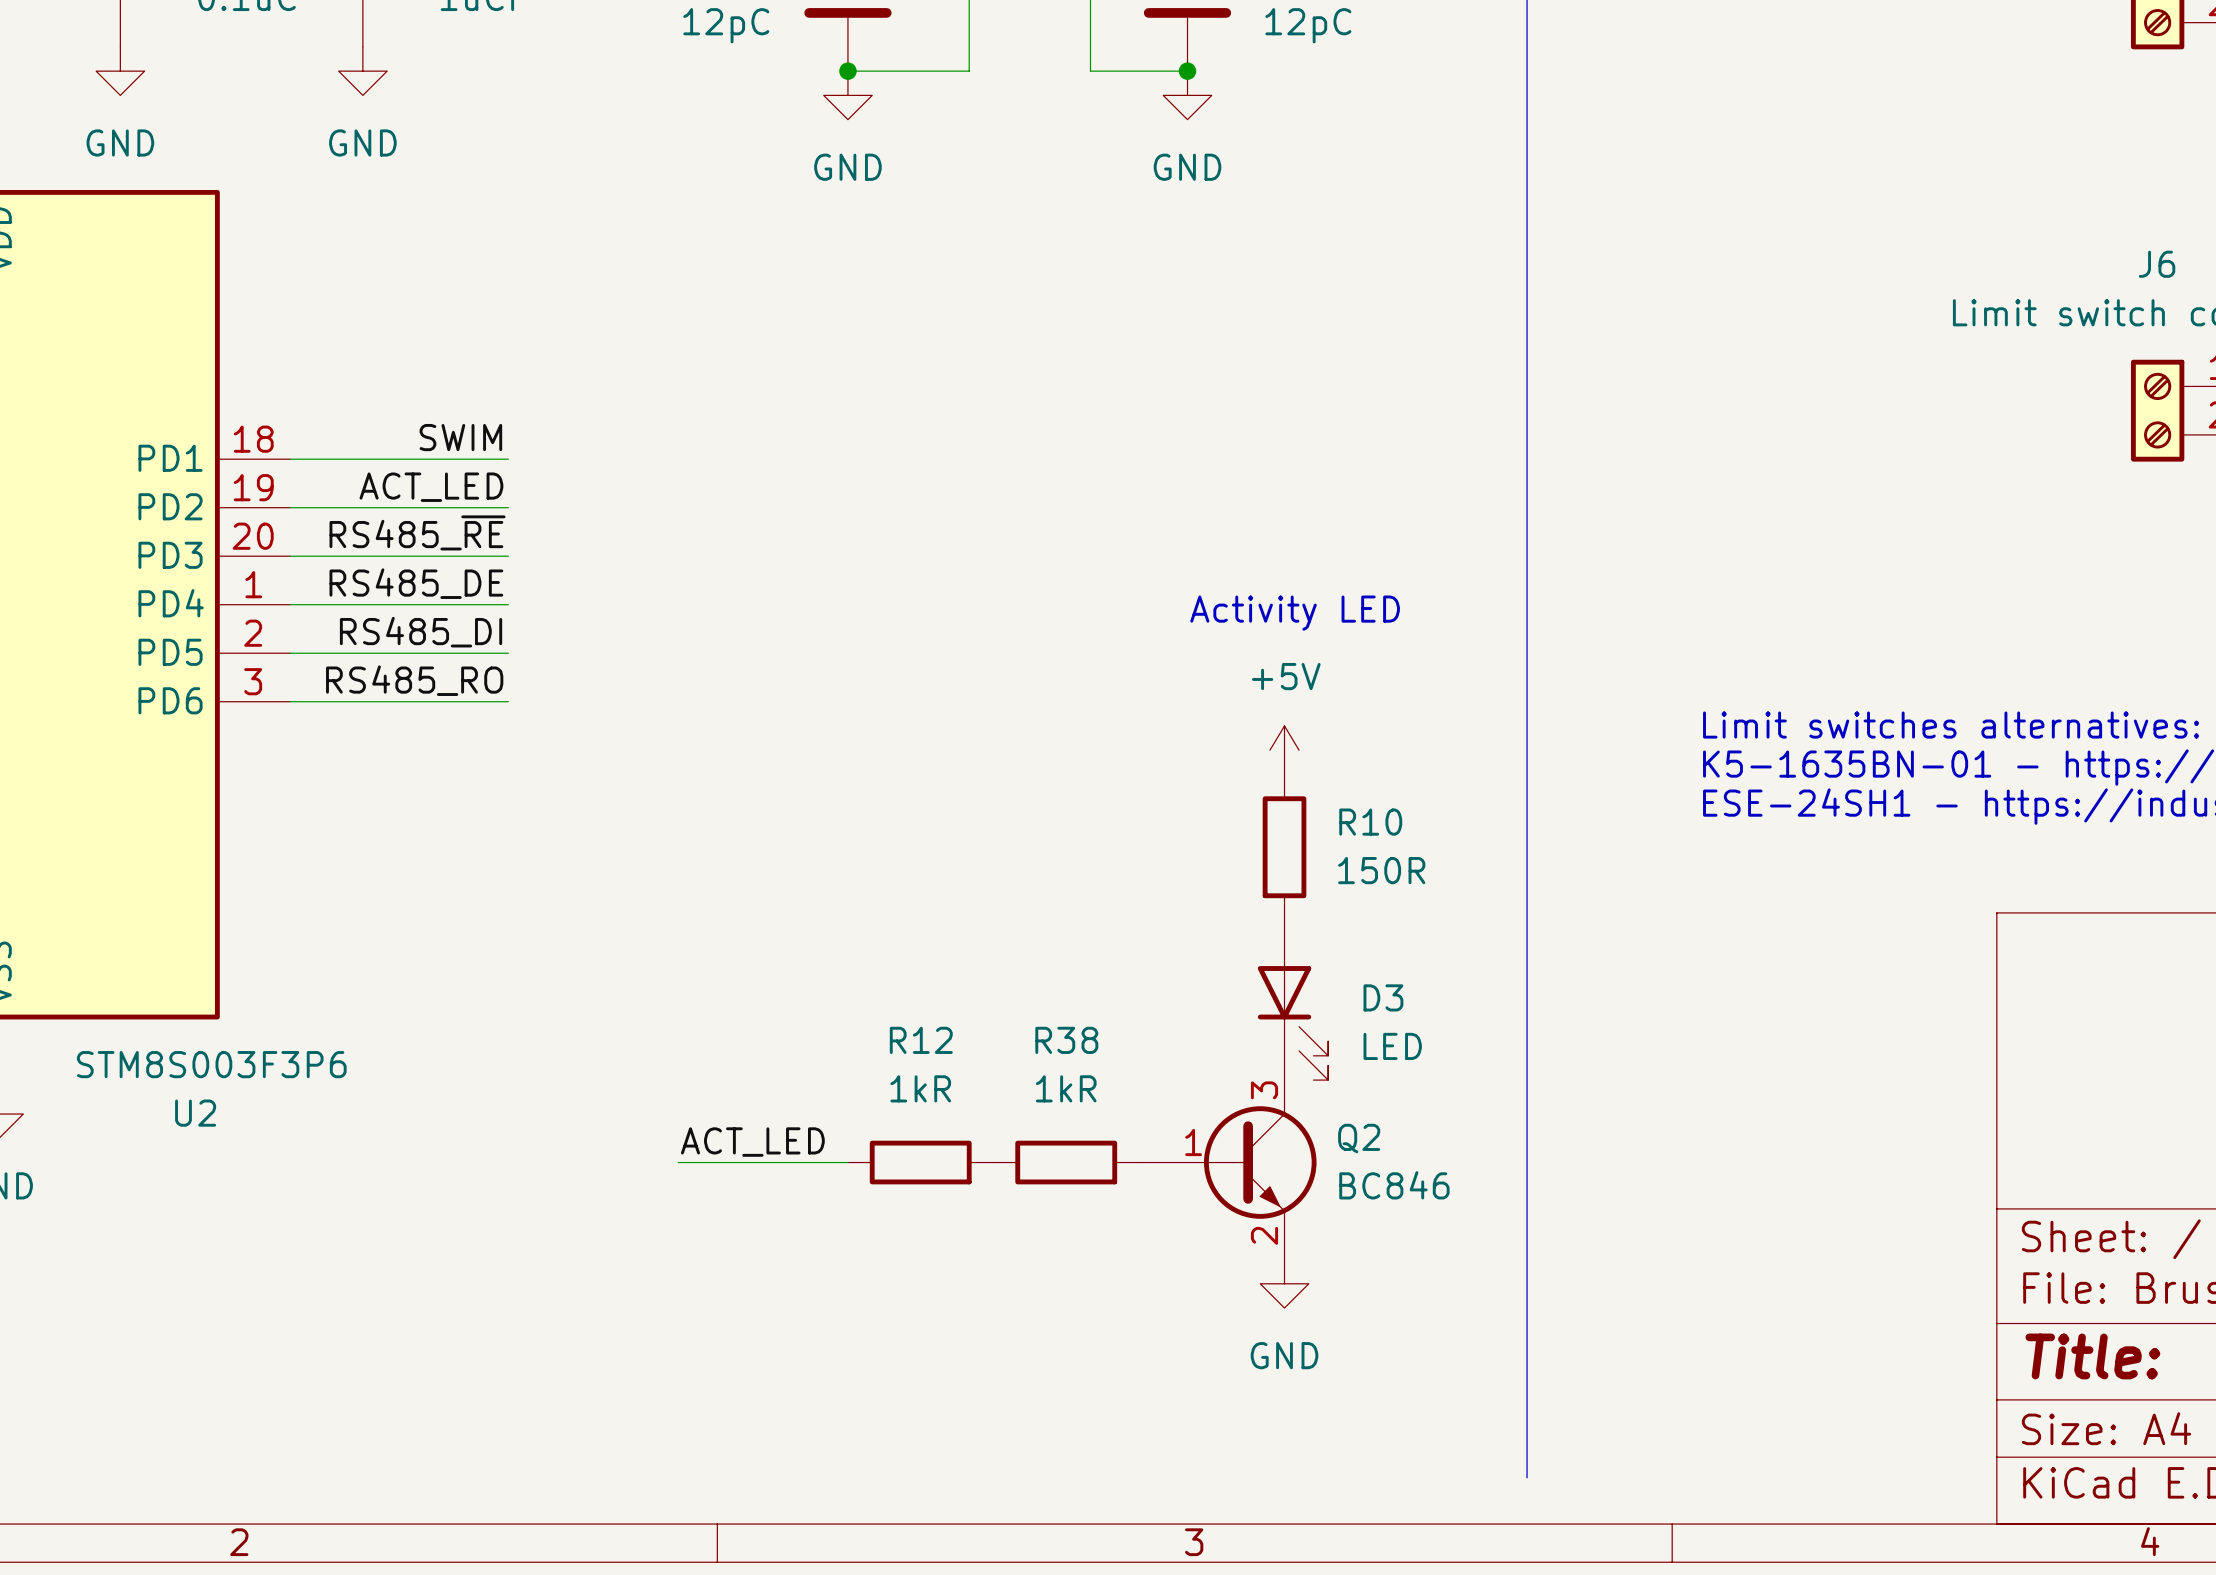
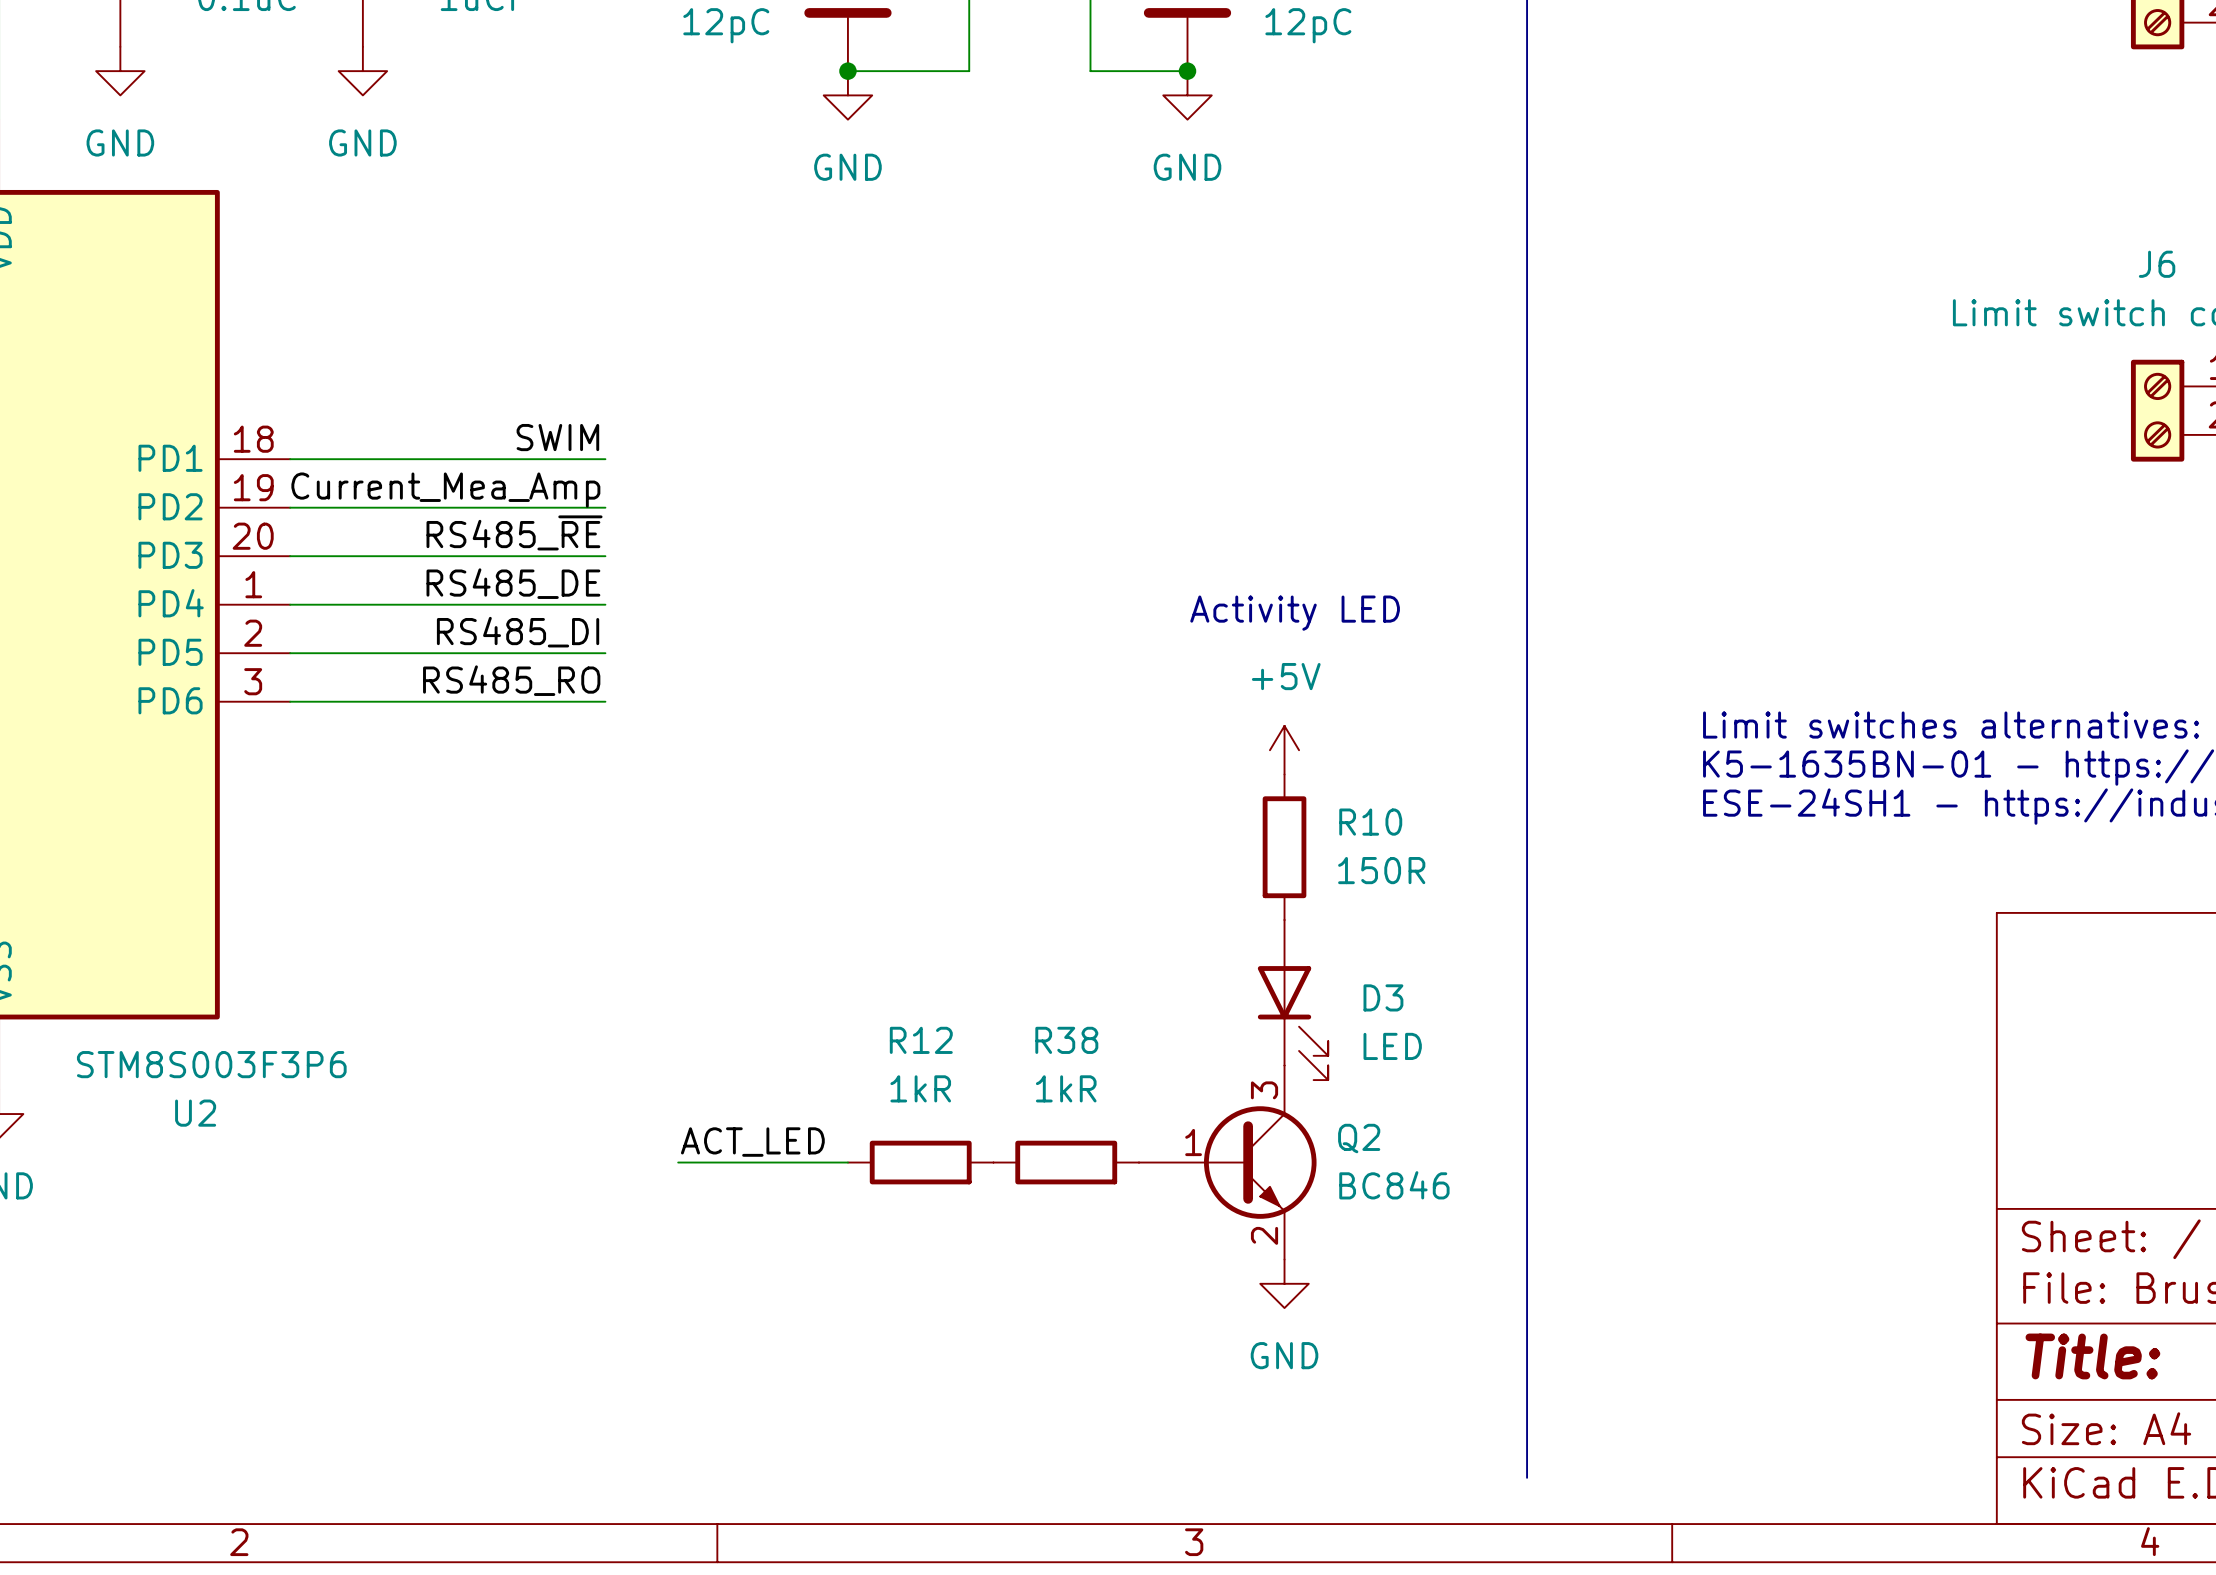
label position: SWIM (460, 437) -> SWIM (557, 437)
wire: none -> (508, 459) (605, 459)
label: ACT_LED (431, 487) -> none
label: none -> Current_Mea_Amp (445, 490)
wire: none -> (508, 507) (605, 507)
label position: RS485_~{RE} (417, 532) -> RS485_~{RE} (514, 532)
wire: none -> (508, 556) (605, 556)
label position: RS485_DE (416, 583) -> RS485_DE (513, 583)
wire: none -> (508, 604) (605, 604)
label position: RS485_DI (421, 632) -> RS485_DI (518, 632)
wire: none -> (508, 653) (605, 653)
label position: RS485_RO (414, 680) -> RS485_RO (511, 680)
wire: none -> (508, 701) (605, 701)

